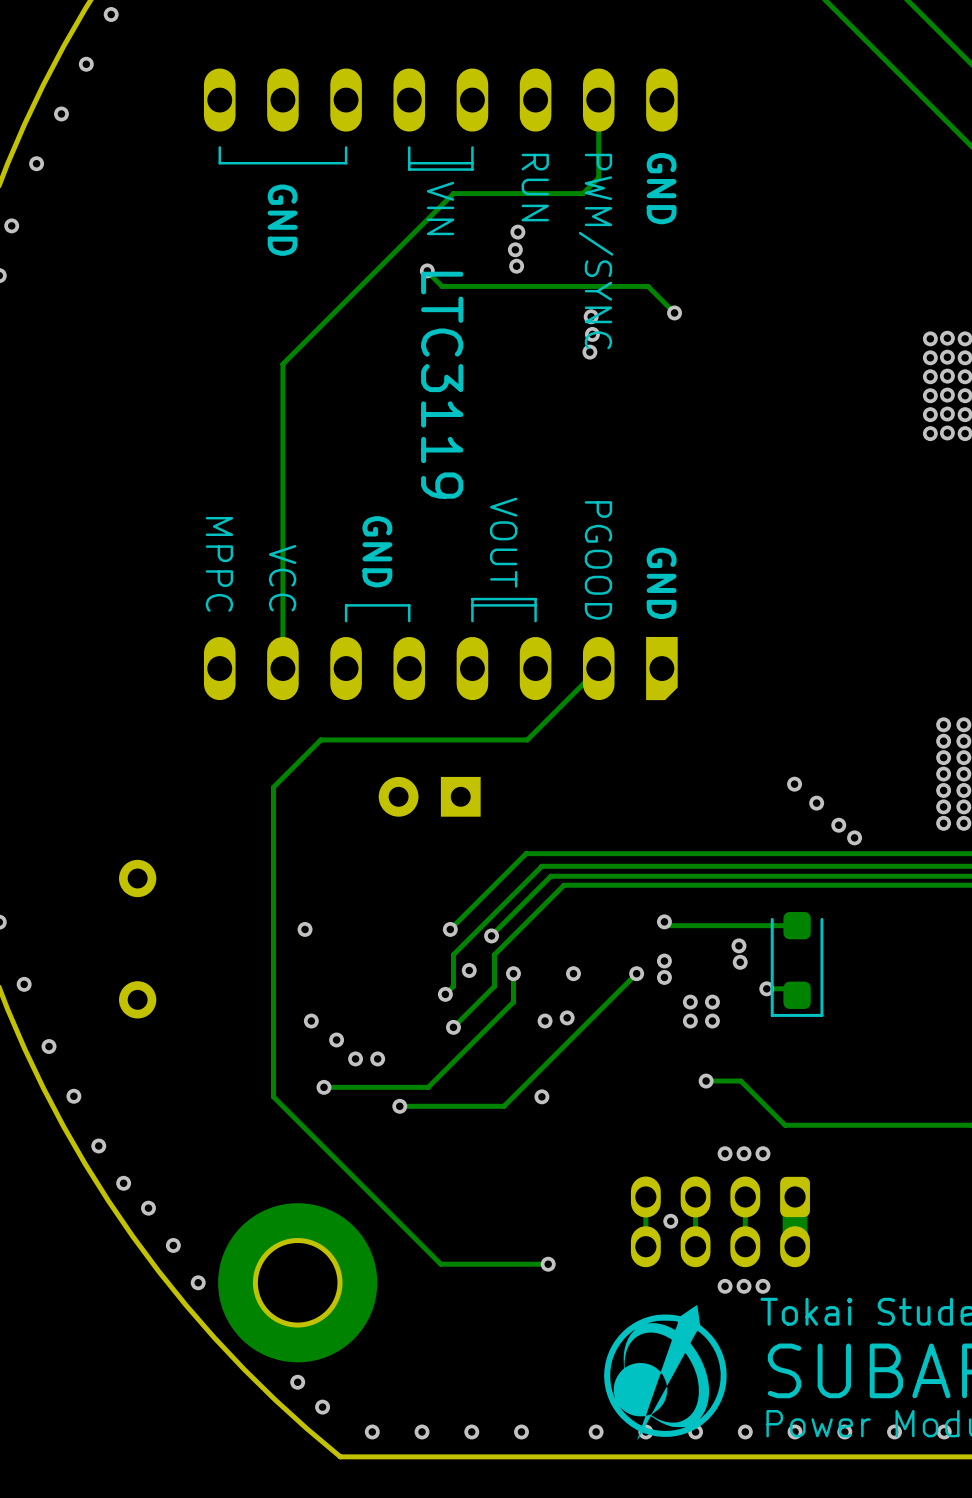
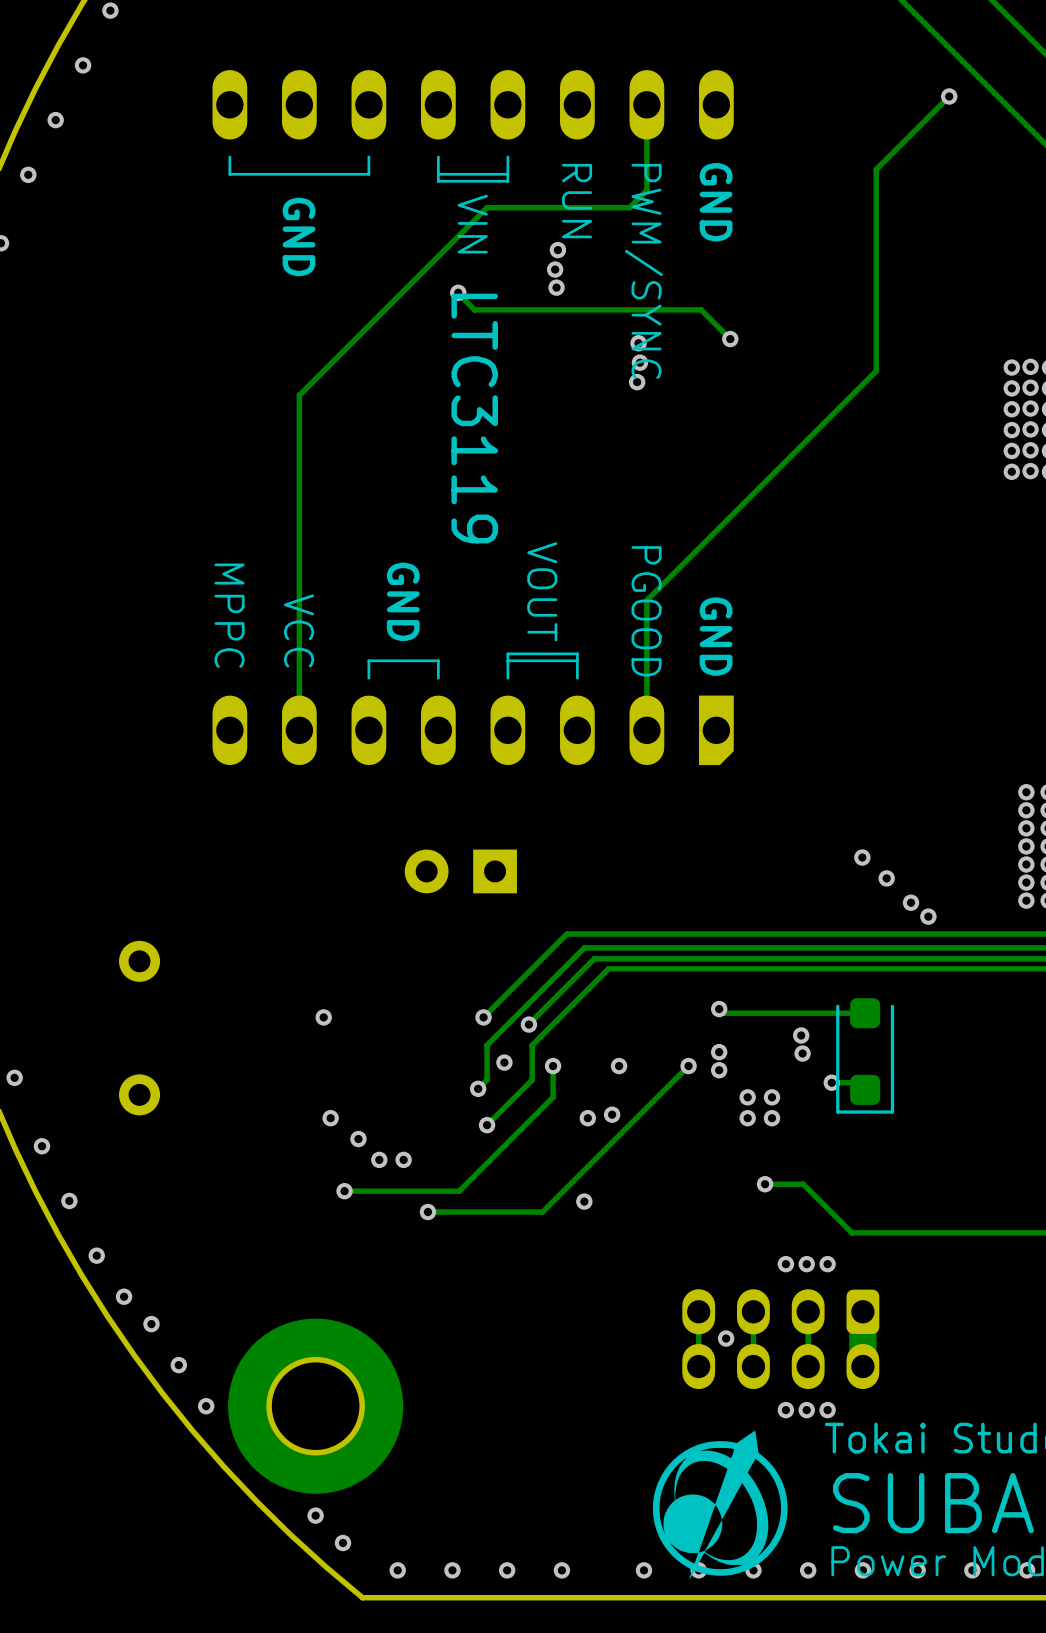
via: none -> (949, 96)
track: (598, 668) (527, 739) (320, 739) (273, 787) (273, 1096) (440, 1264) (548, 1264) -> (646, 730) (646, 600) (876, 371) (876, 169) (949, 96)
via: (548, 1264) -> none

